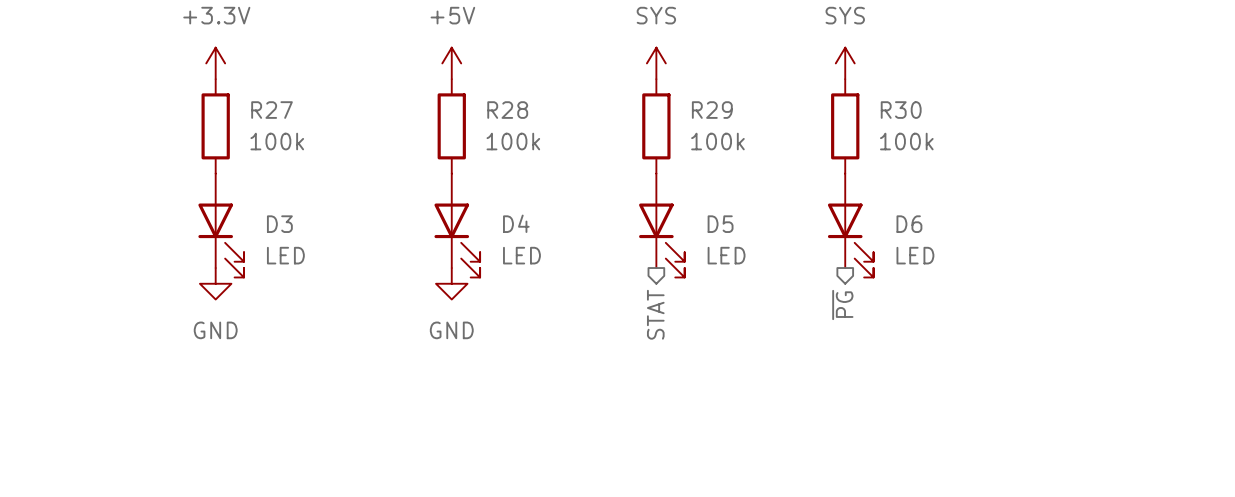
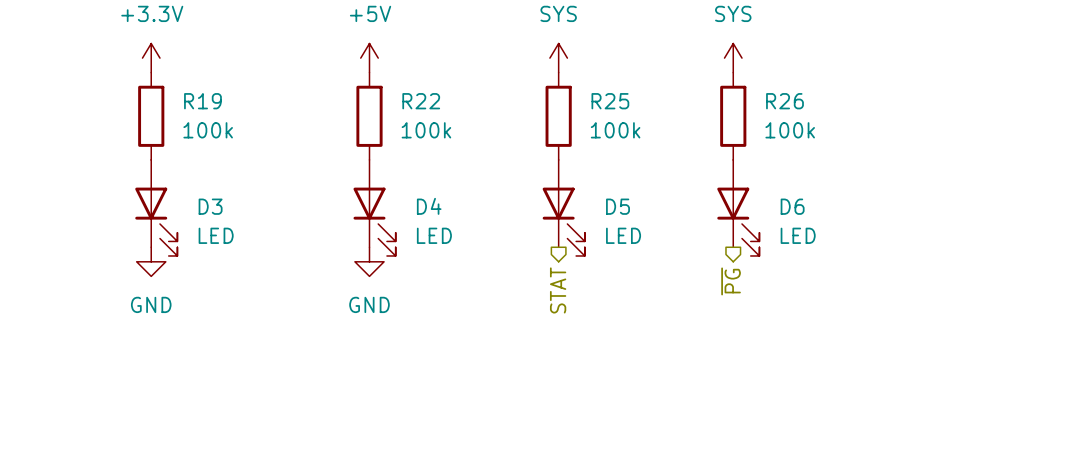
R27 name: R27 (272, 110) -> R19 (202, 101)
R28 name: R28 (507, 110) -> R22 (421, 101)
R29 name: R29 (712, 110) -> R25 (610, 101)
R30 name: R30 (901, 110) -> R26 (784, 101)

